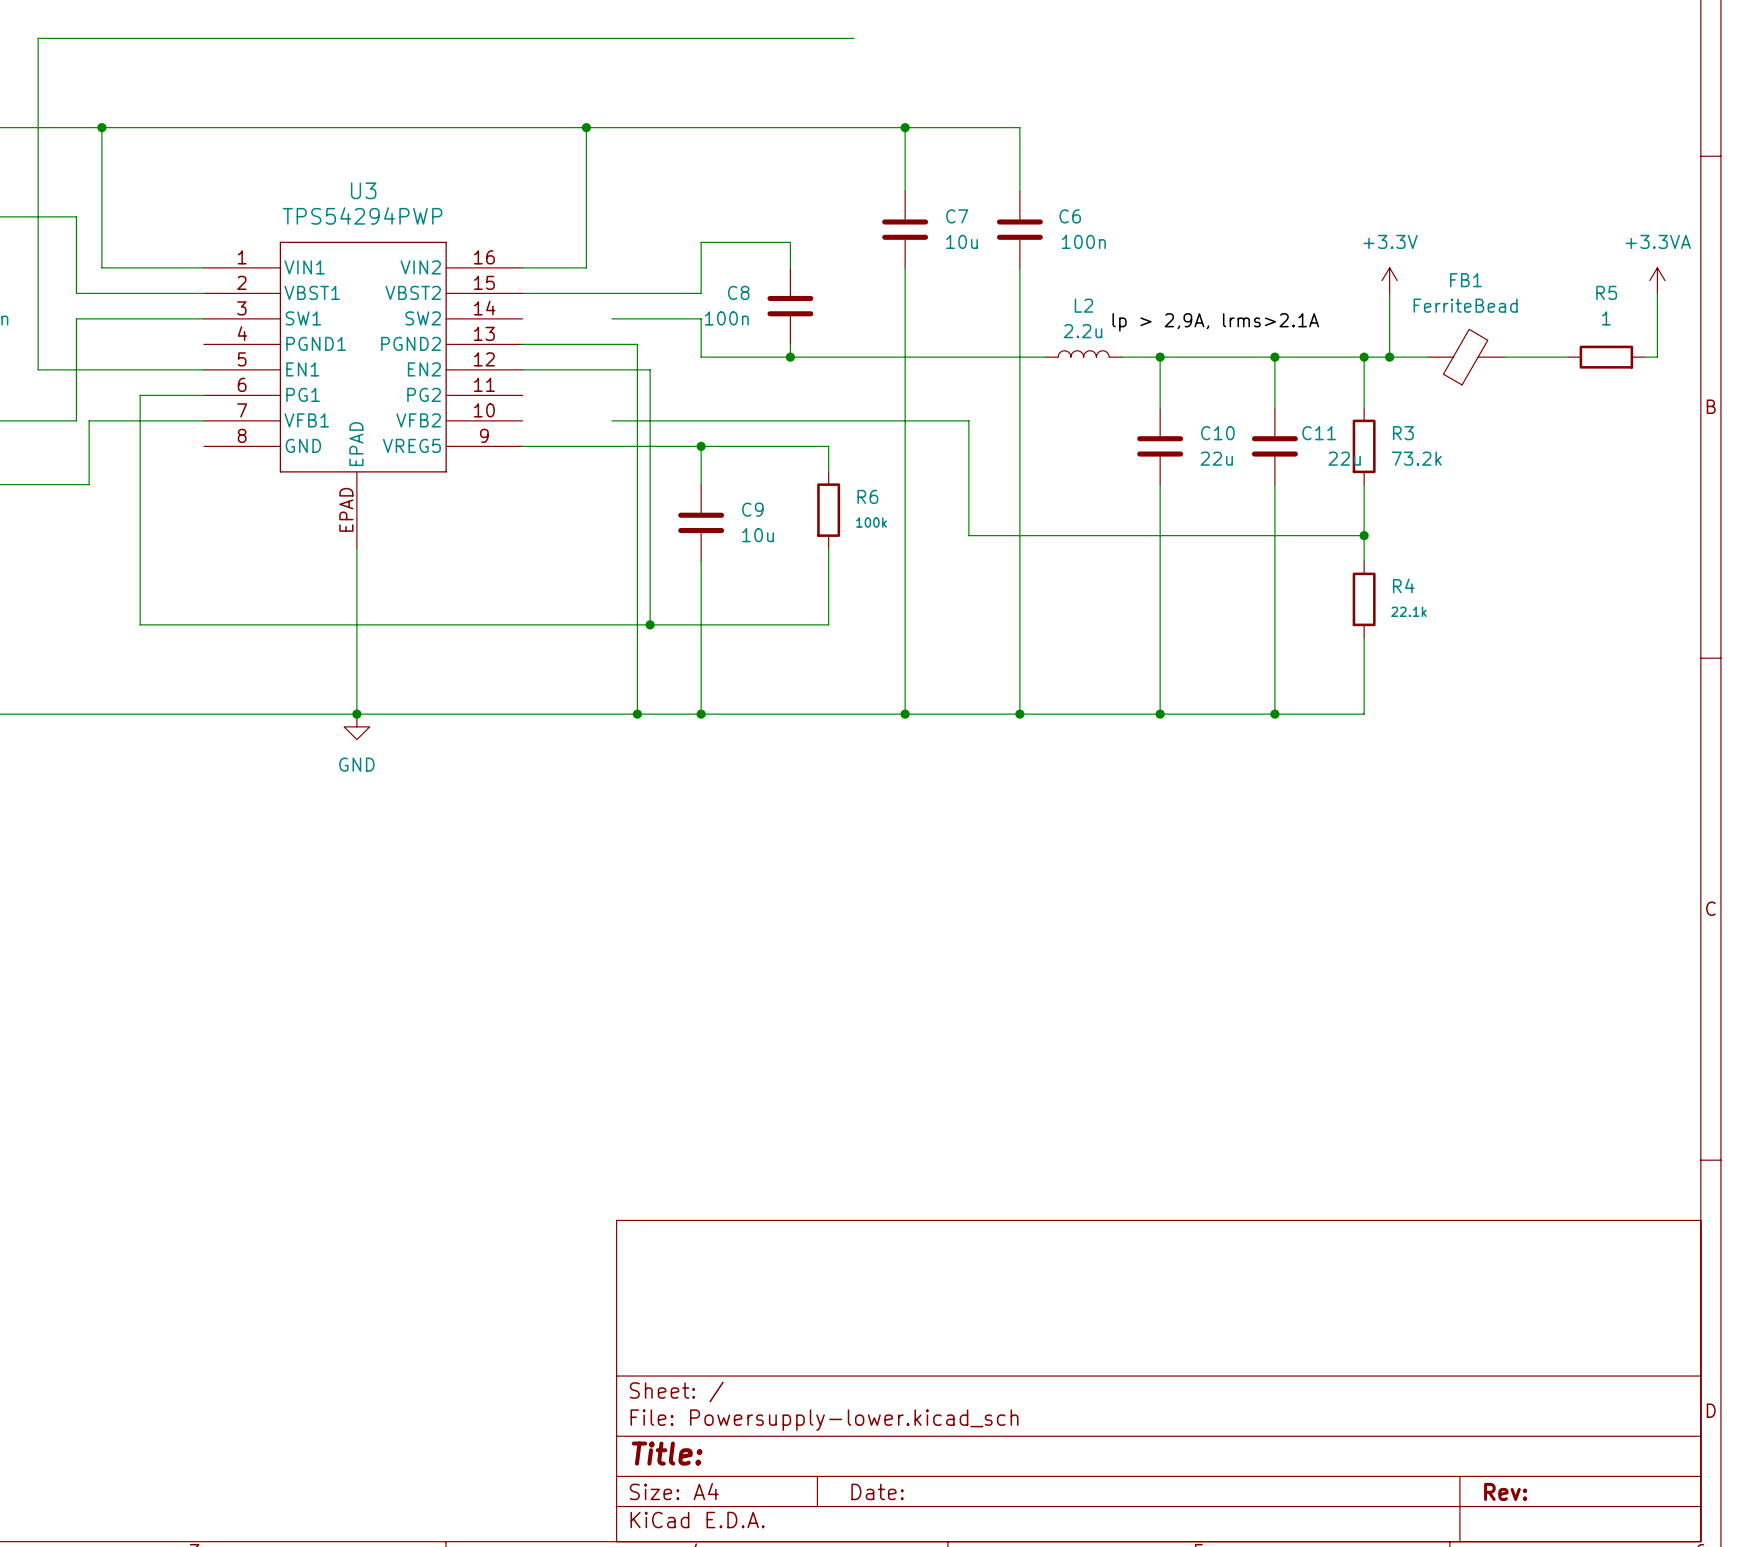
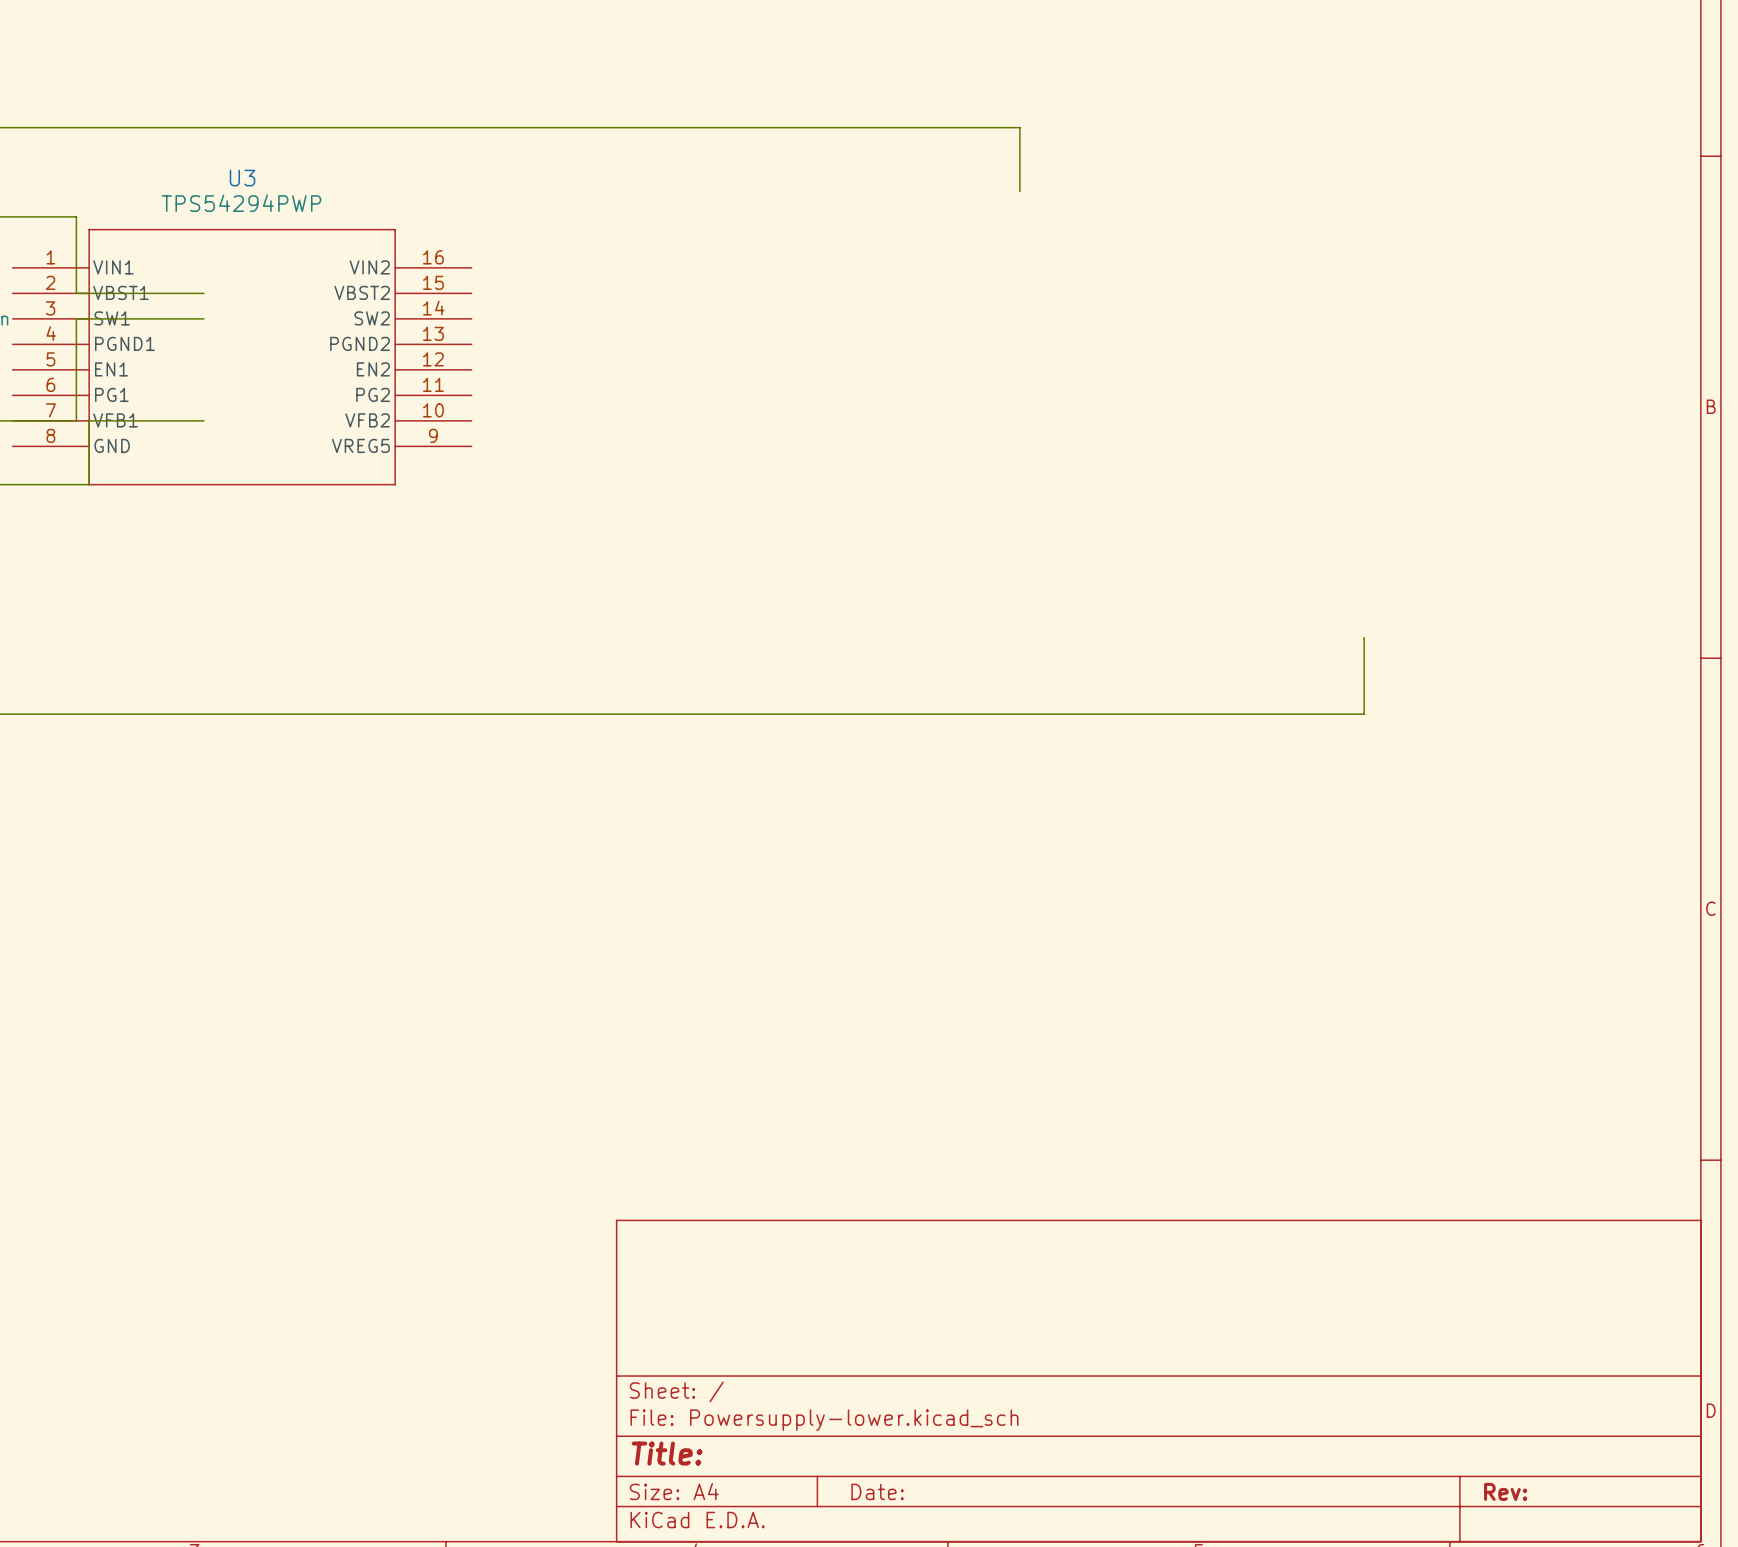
wire: (854, 38) (38, 38) (38, 369) (203, 369) -> none
wire: (101, 127) (101, 267) (203, 267) -> none
junction: (101, 127) -> none
wire: (586, 127) (586, 267) (522, 267) -> none
junction: (586, 127) -> none
wire: (905, 127) (905, 191) -> none
junction: (905, 127) -> none
U3 name position: U3 (363, 190) -> U3 (242, 178)
U3 value position: TPS54294PWP (362, 215) -> TPS54294PWP (241, 203)
C7: 10u (905, 229) -> none
C6: 100n (1019, 229) -> none
U3 symbol: [203, 241, 523, 549] -> [12, 229, 472, 486]
wire: (790, 267) (790, 242) (701, 242) (701, 293) (522, 293) -> none
wire: (905, 267) (905, 714) -> none
wire: (1019, 267) (1019, 714) -> none
power symbol: +3.3V (1389, 280) -> none
power symbol: +3.3VA (1657, 280) -> none
wire: (1389, 293) (1389, 357) -> none
wire: (1657, 293) (1657, 357) (1644, 357) -> none
C8: 100n (790, 306) -> none
wire: (611, 318) (701, 318) (701, 357) (1045, 357) -> none
label: lp > 2,9A, lrms>2.1A (1215, 322) -> none
wire: (522, 344) (637, 344) (637, 714) -> none
wire: (790, 344) (790, 357) -> none
L2: 2.2u (1083, 353) -> none
junction: (790, 357) -> none
wire: (1121, 357) (1427, 357) -> none
wire: (1160, 357) (1160, 408) -> none
junction: (1160, 357) -> none
wire: (1274, 357) (1274, 408) -> none
junction: (1274, 357) -> none
wire: (1364, 357) (1364, 408) -> none
junction: (1364, 357) -> none
junction: (1389, 357) -> none
FB1: FerriteBead (1466, 357) -> none
wire: (1504, 357) (1568, 357) -> none
R5: 1 (1606, 357) -> none
wire: (522, 369) (650, 369) (650, 624) -> none
wire: (203, 395) (140, 395) (140, 624) (828, 624) (828, 548) -> none
wire: (611, 420) (968, 420) (968, 535) (1364, 535) -> none
wire: (522, 446) (828, 446) (828, 471) -> none
wire: (701, 446) (701, 484) -> none
junction: (701, 446) -> none
C10: 22u (1160, 446) -> none
C11: 22u (1274, 446) -> none
R3: 73.2k (1364, 446) -> none
wire: (1160, 484) (1160, 714) -> none
wire: (1274, 484) (1274, 714) -> none
wire: (1364, 484) (1364, 561) -> none
R6: 100k (828, 510) -> none
C9: 10u (701, 522) -> none
junction: (1364, 535) -> none
wire: (356, 548) (356, 714) -> none
wire: (701, 561) (701, 714) -> none
R4: 22.1k (1364, 599) -> none
junction: (650, 624) -> none
junction: (356, 714) -> none
junction: (637, 714) -> none
junction: (701, 714) -> none
junction: (905, 714) -> none
junction: (1019, 714) -> none
junction: (1160, 714) -> none
junction: (1274, 714) -> none
power symbol: GND (356, 726) -> none

